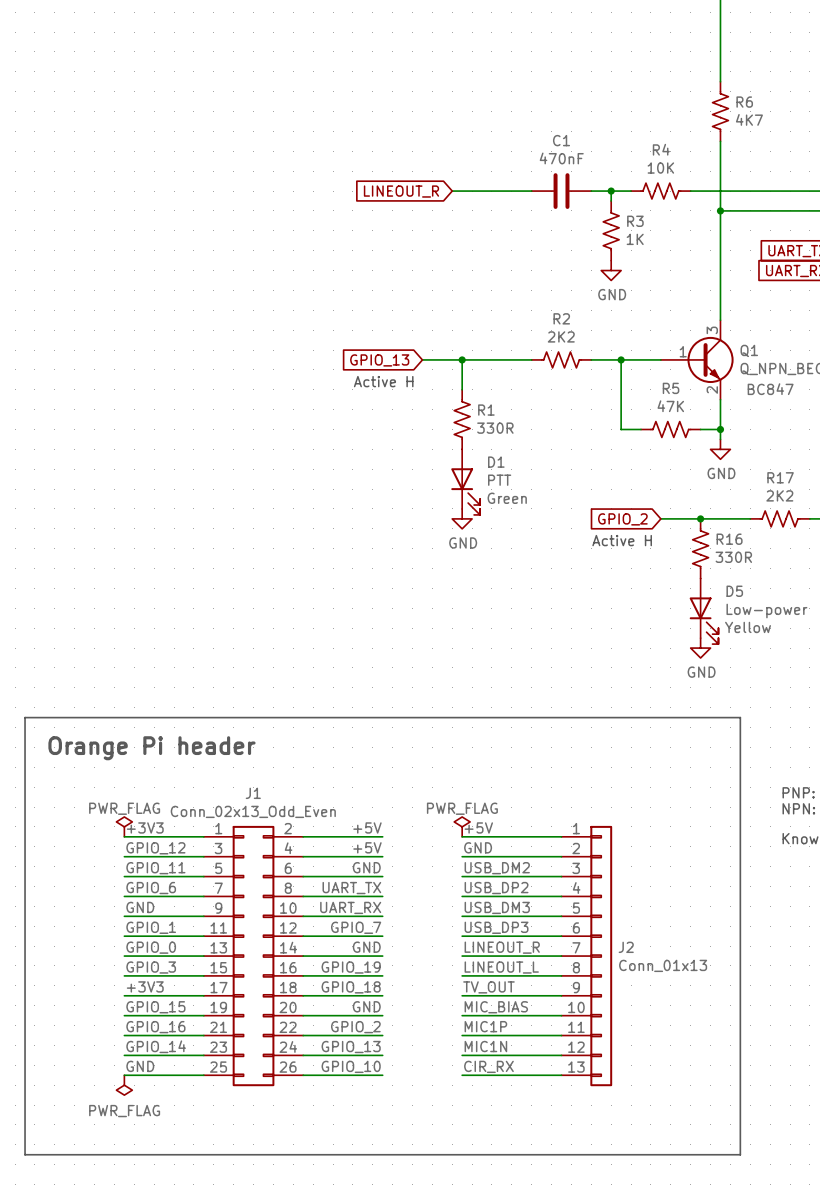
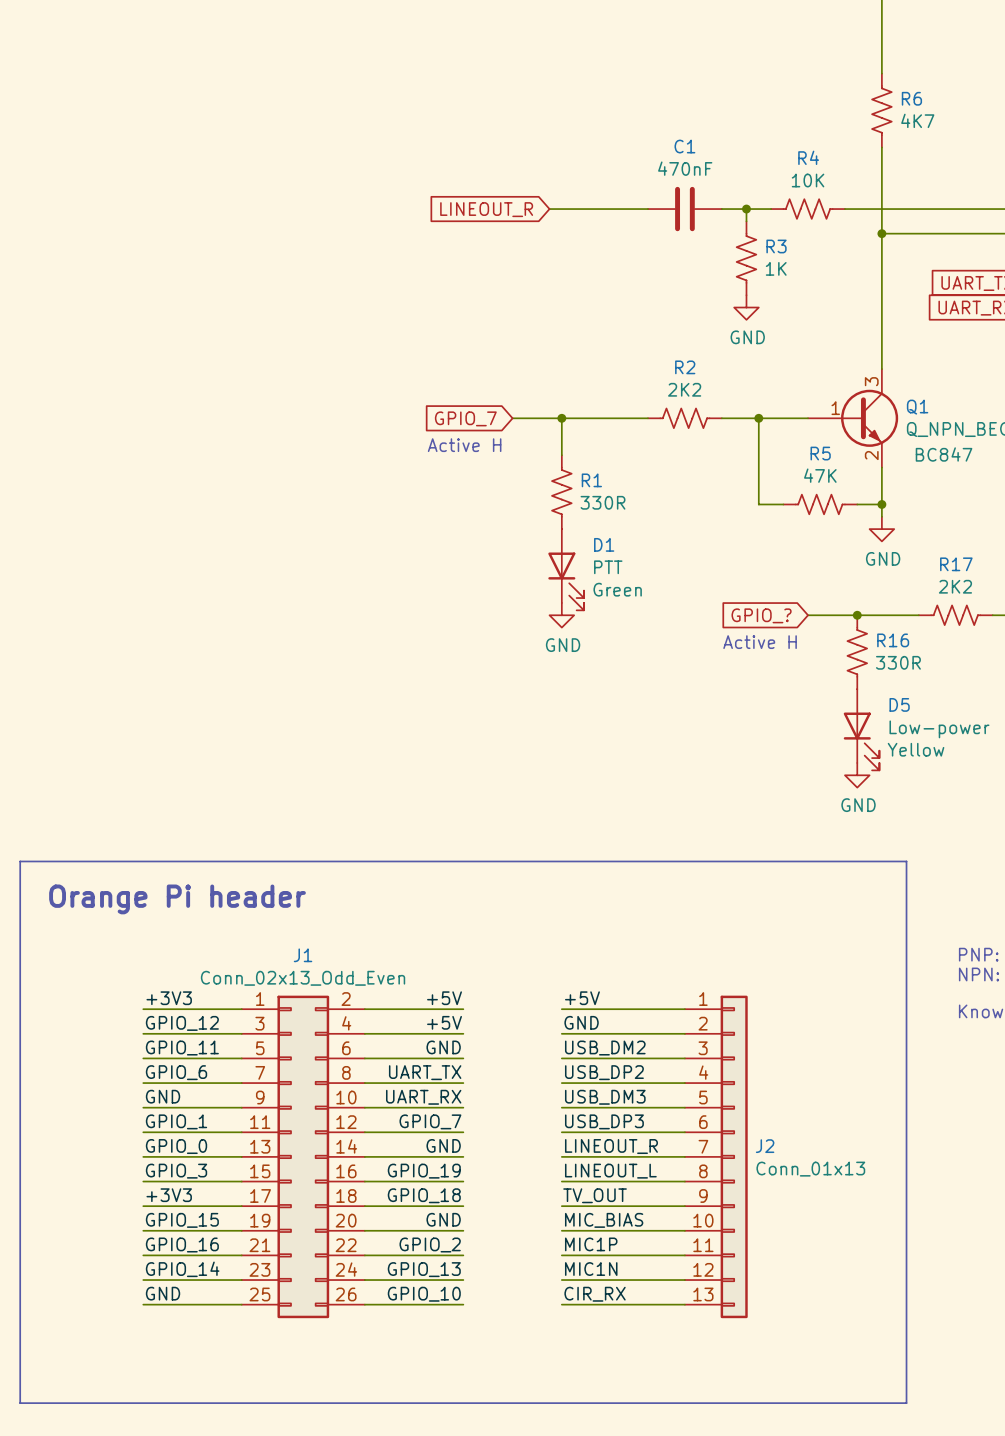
global label: GPIO_13 (379, 360) -> GPIO_7 (465, 418)
global label: GPIO_2 (622, 519) -> GPIO_? (761, 615)
power symbol: PWR_FLAG (124, 826) -> none
power symbol: PWR_FLAG (462, 826) -> none
power symbol: PWR_FLAG (124, 1085) -> none

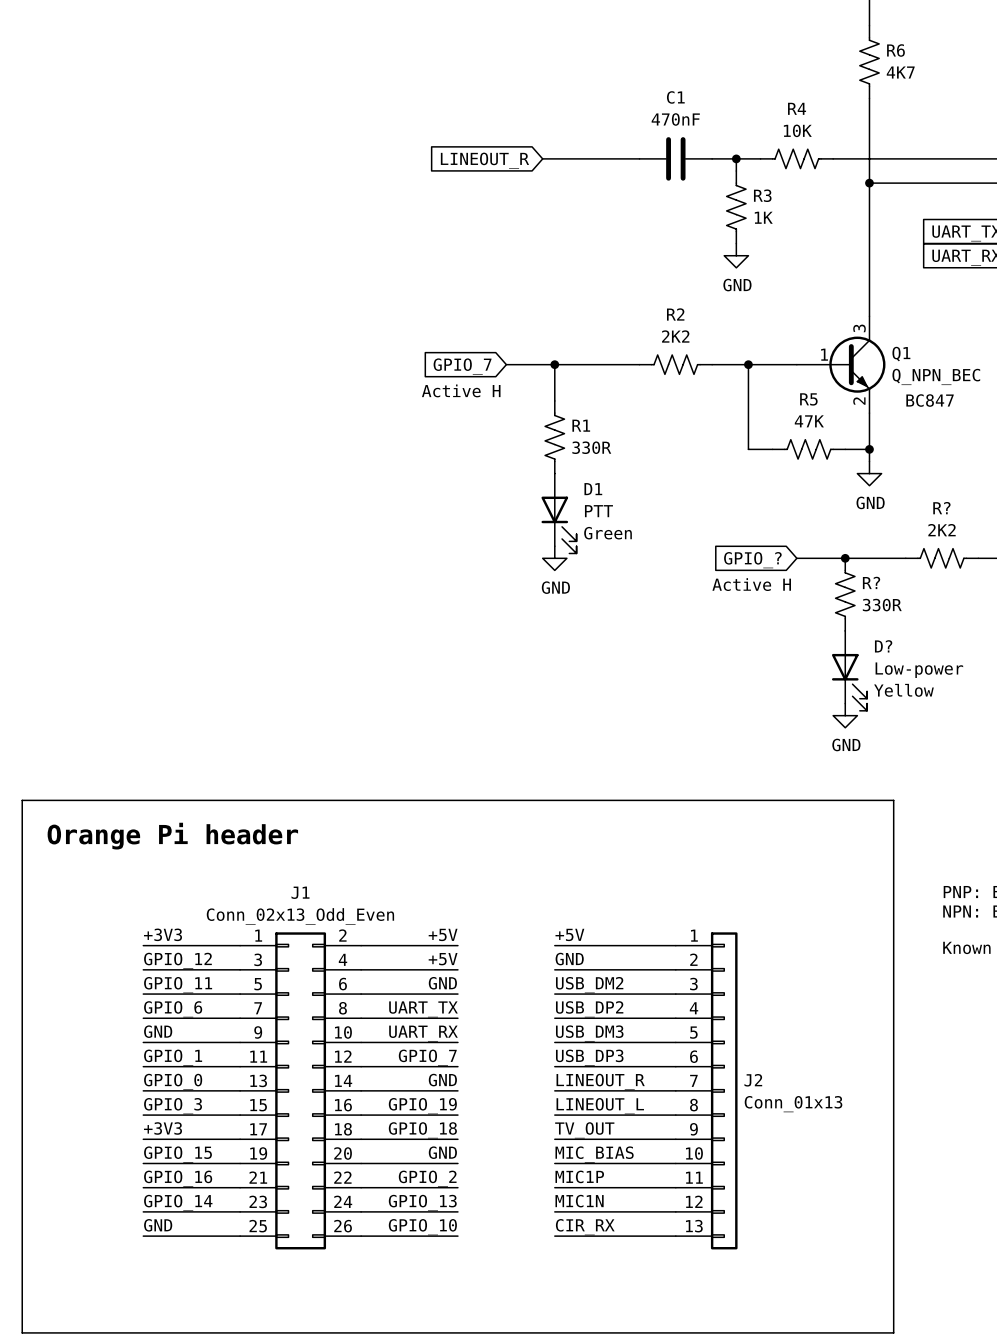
R17 name: R17 (956, 564) -> R? (941, 508)
R16 name: R16 (893, 640) -> R? (871, 582)
D5 name: D5 (899, 704) -> D? (883, 646)

